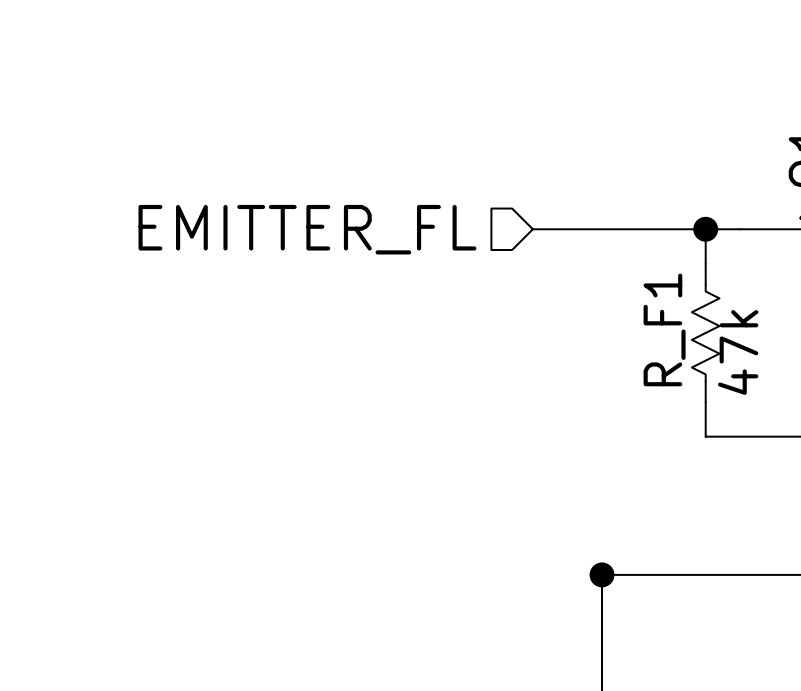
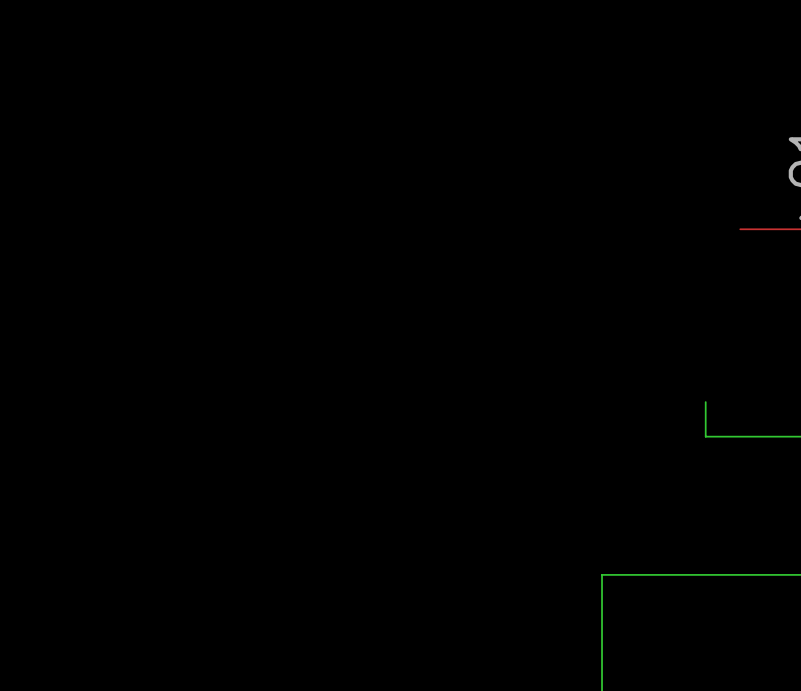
hierarchical label: EMITTER_FL (307, 229) -> none
wire: (532, 229) (740, 229) -> none
wire: (705, 229) (705, 263) -> none
junction: (705, 229) -> none
R_F1: 47k (705, 332) -> none
junction: (602, 574) -> none

